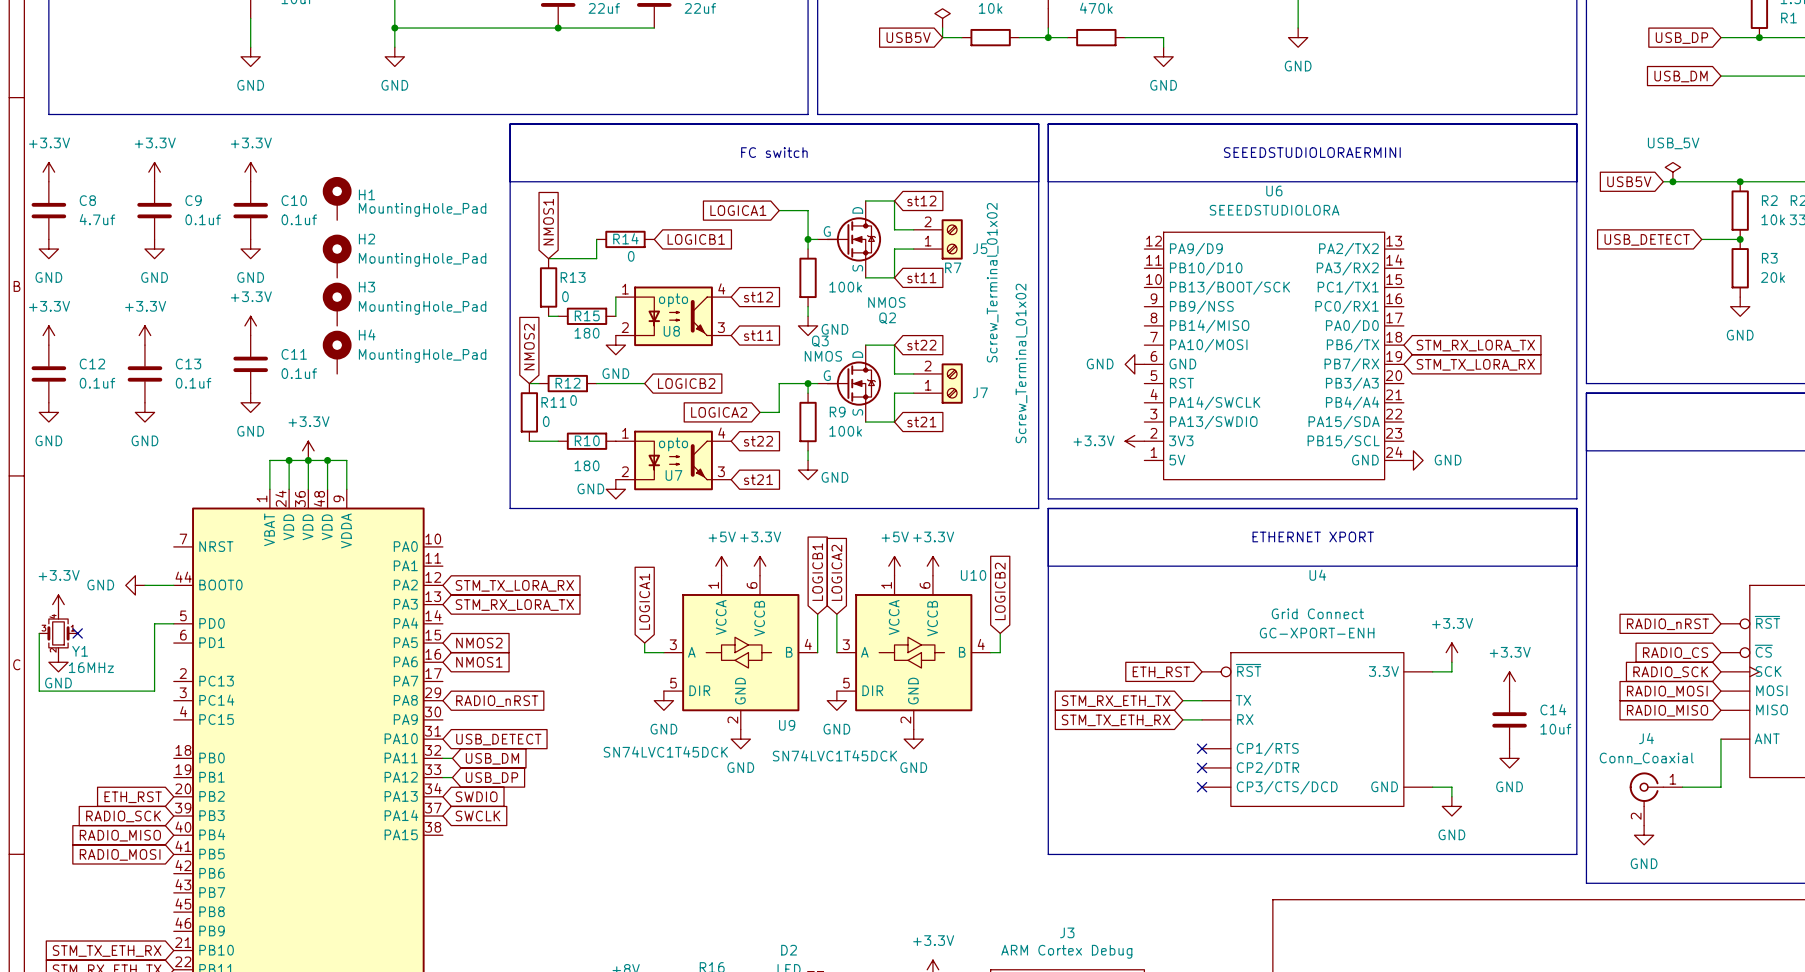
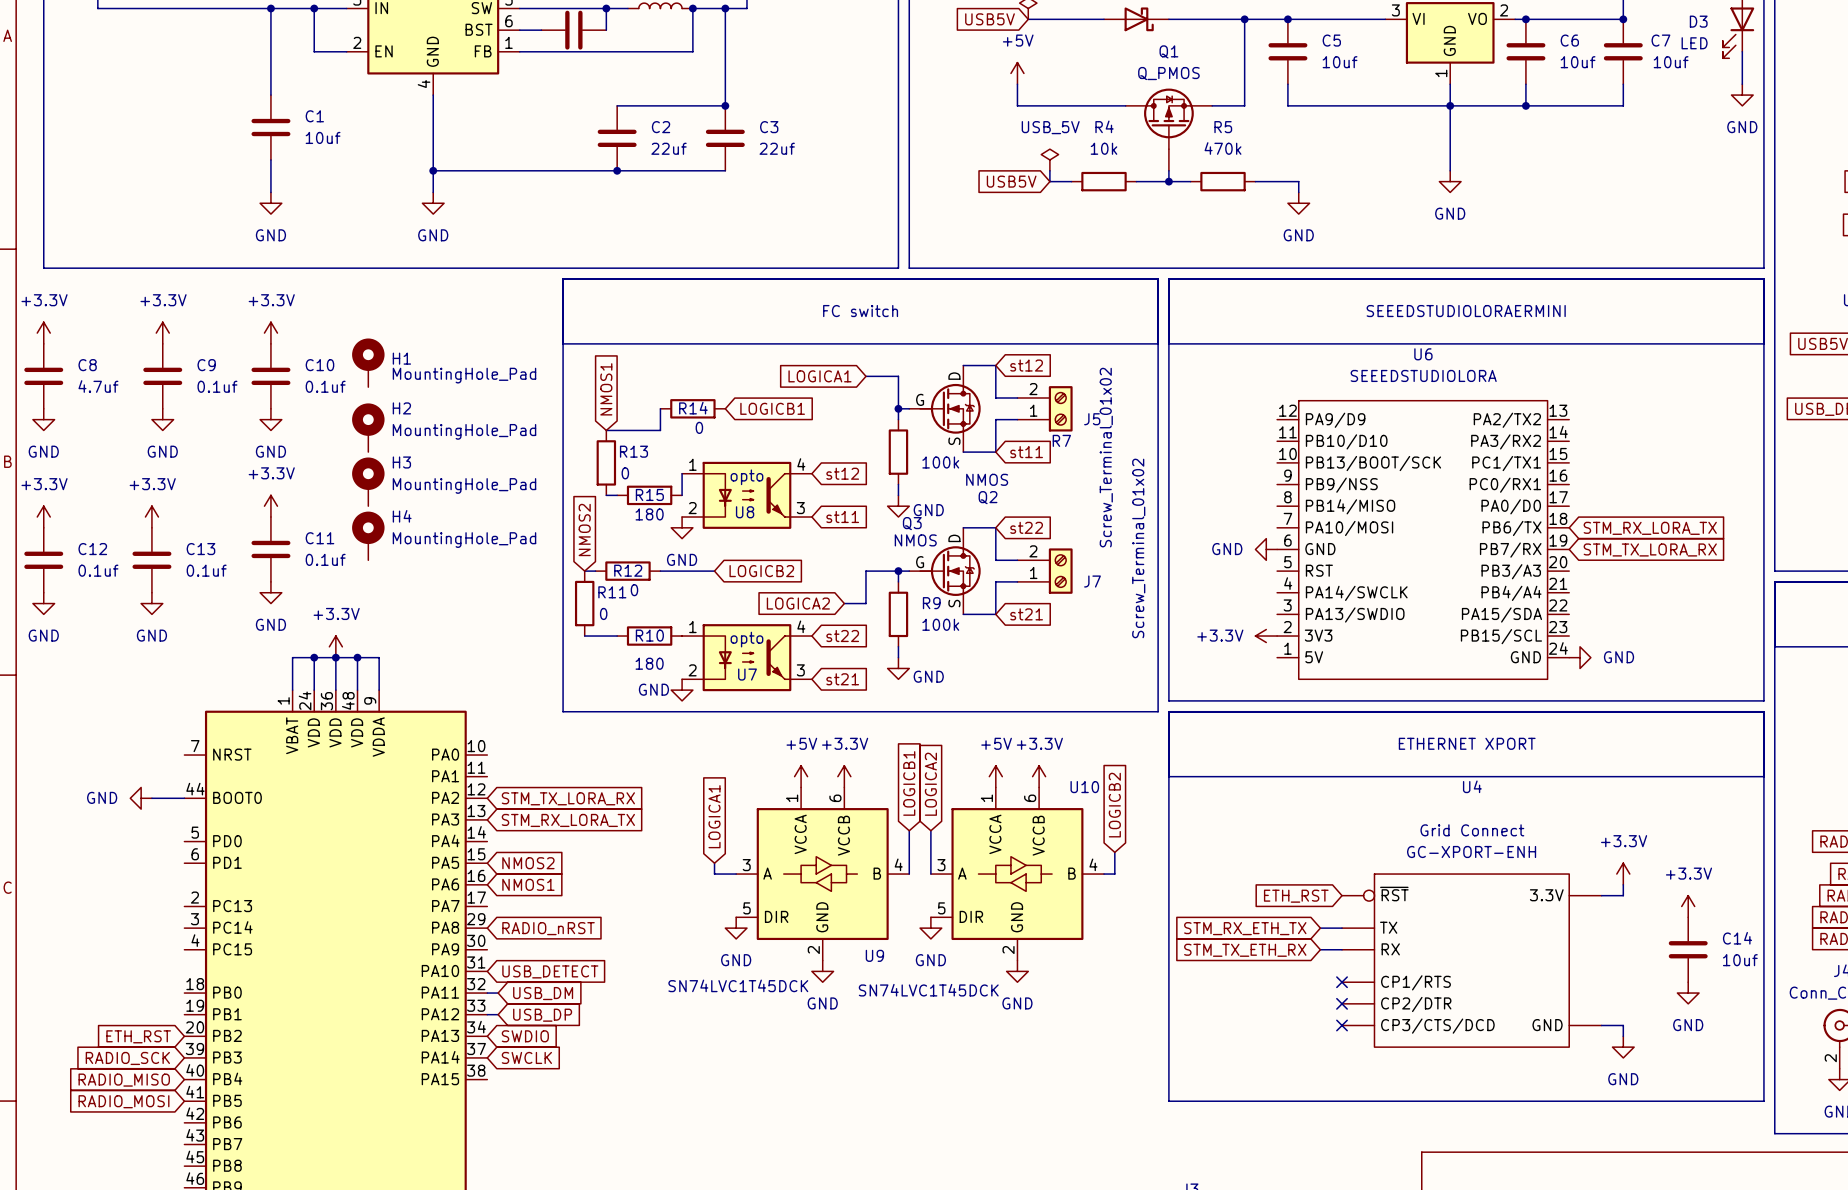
power symbol: +3.3V (58, 604) -> none
wire: (173, 623) (154, 623) (154, 691) (39, 691) (39, 633) -> none
Y1: 16MHz (58, 633) -> none
no-connect mark: (77, 633) -> none
power symbol: GND (58, 662) -> none

